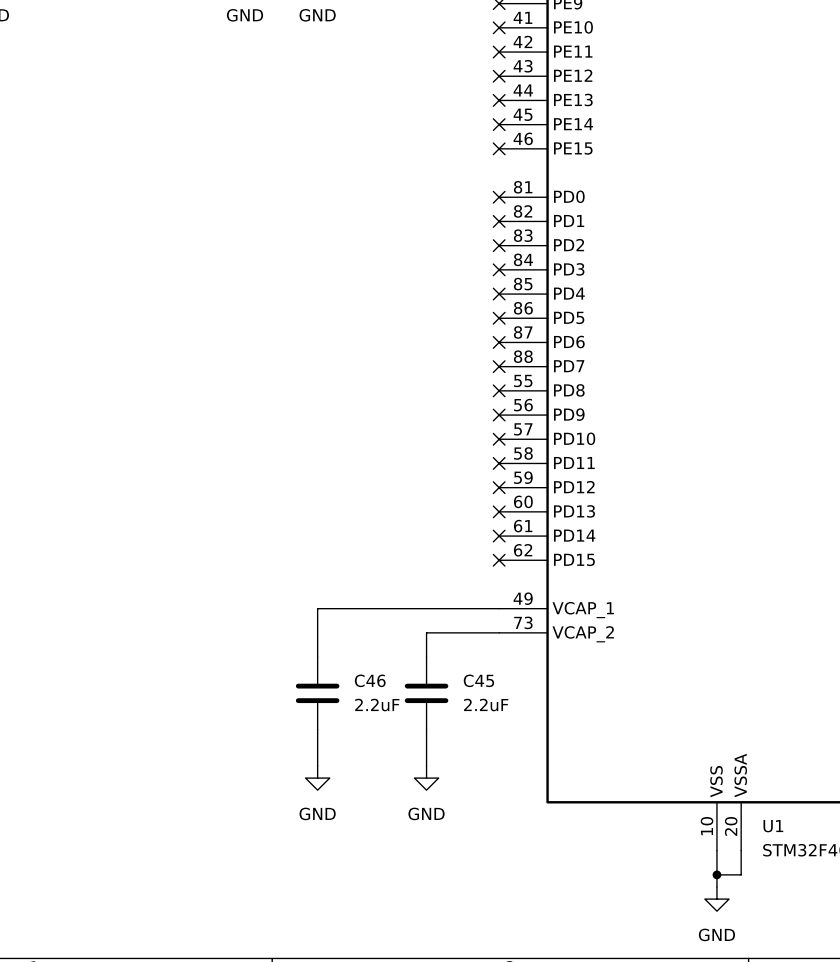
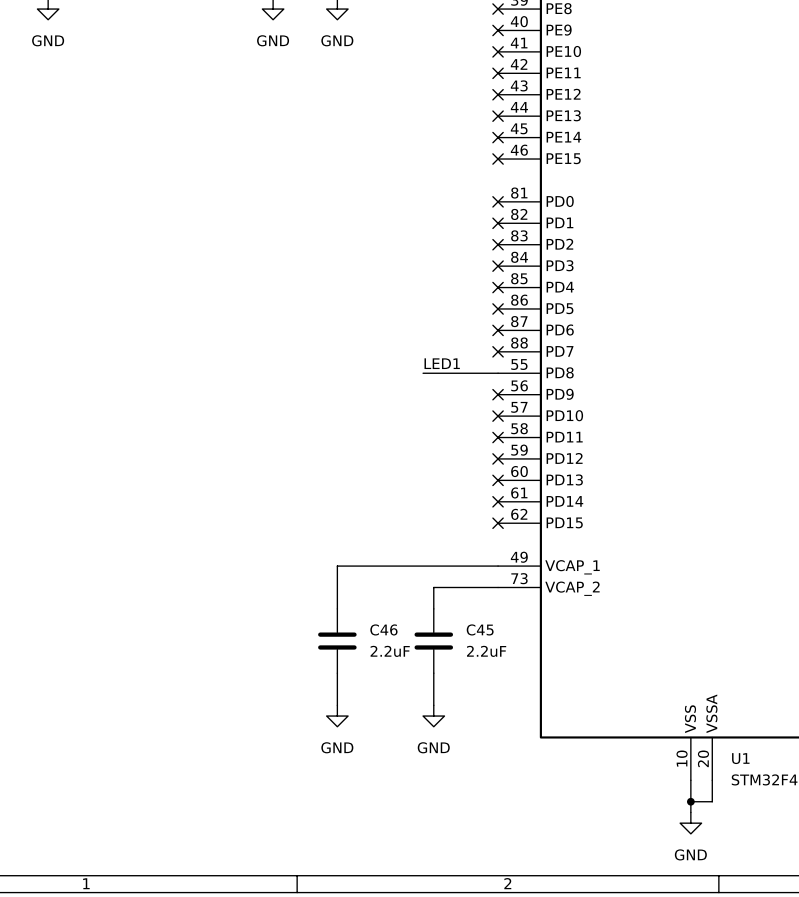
label: none -> LED1 (442, 363)
wire: none -> (423, 373) (498, 373)
no-connect mark: (499, 390) -> none

